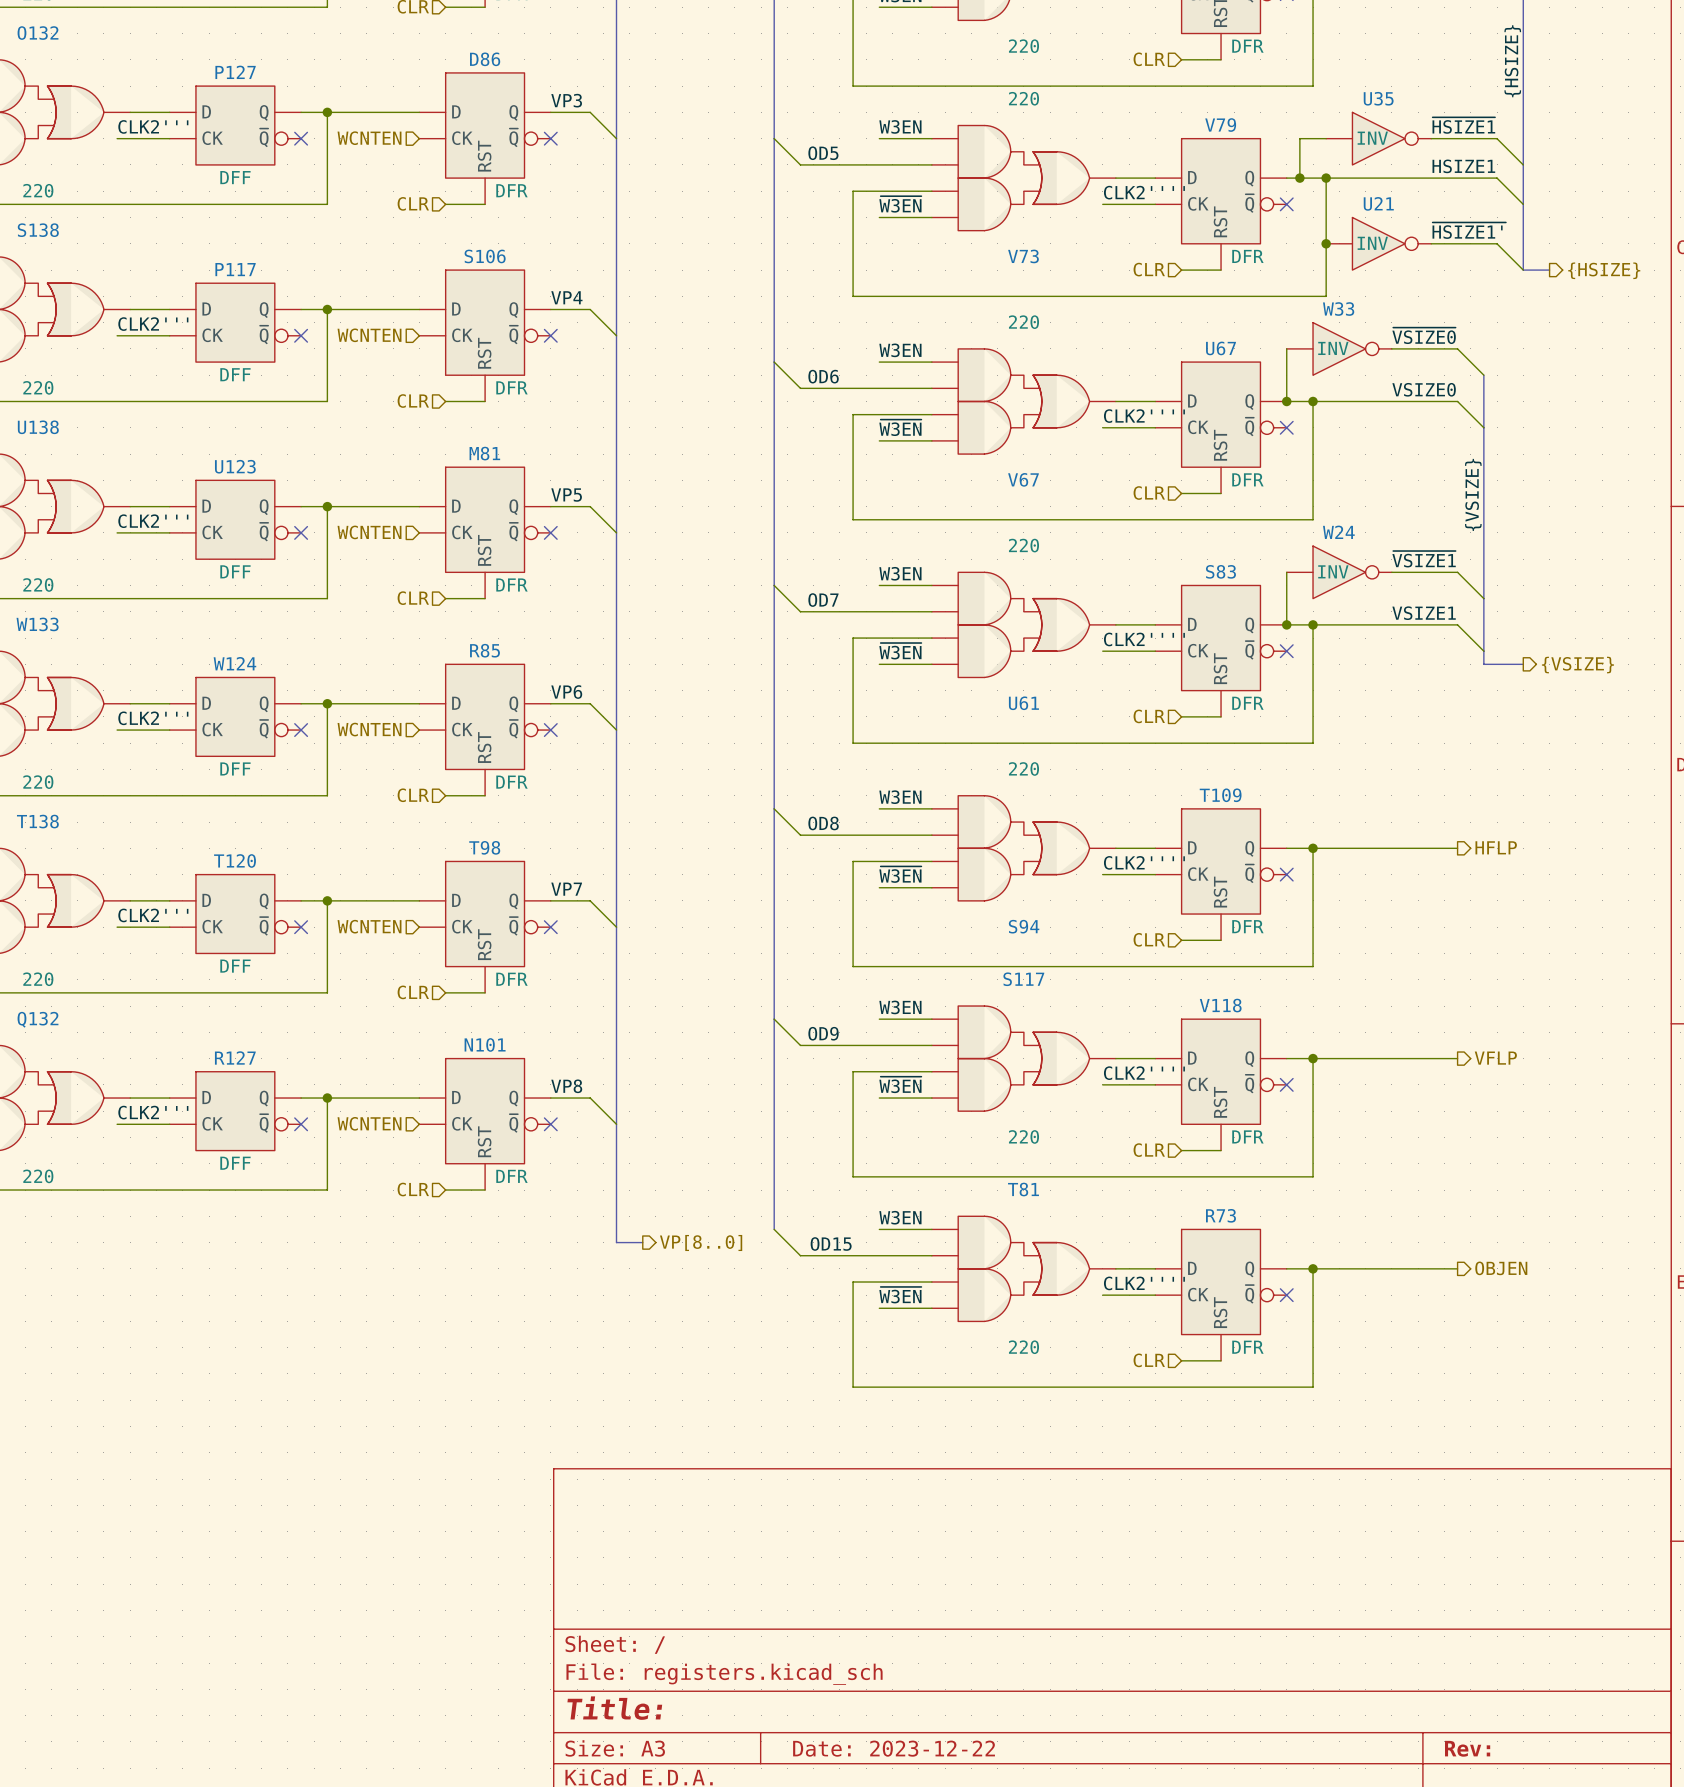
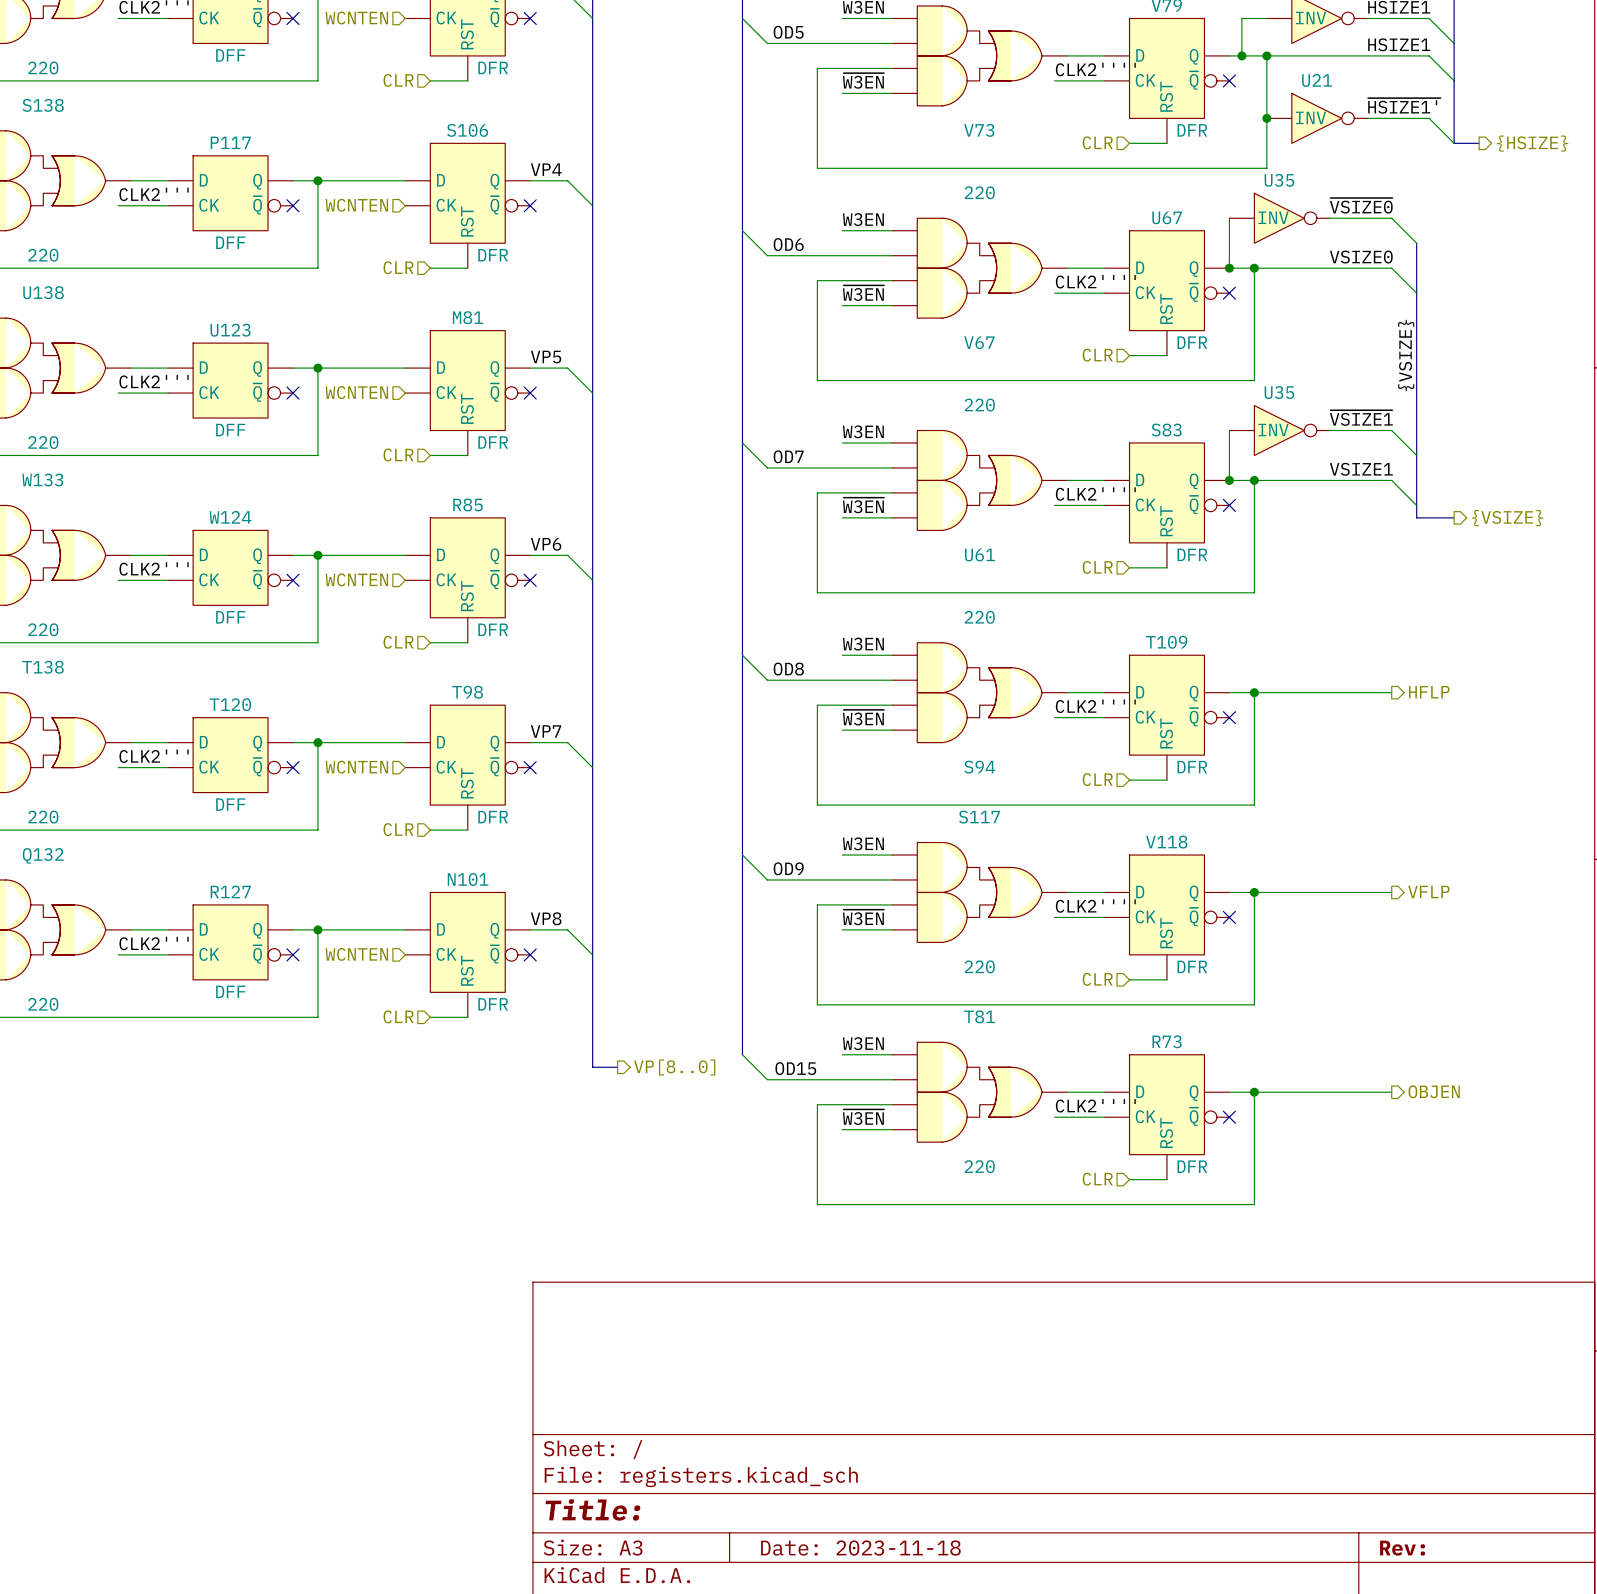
W33 name: W33 (1338, 309) -> U35 (1279, 180)
W24 name: W24 (1338, 532) -> U35 (1279, 392)
title block: Date: 2023-12-22 (894, 1748) -> Date: 2023-11-18 (860, 1548)

